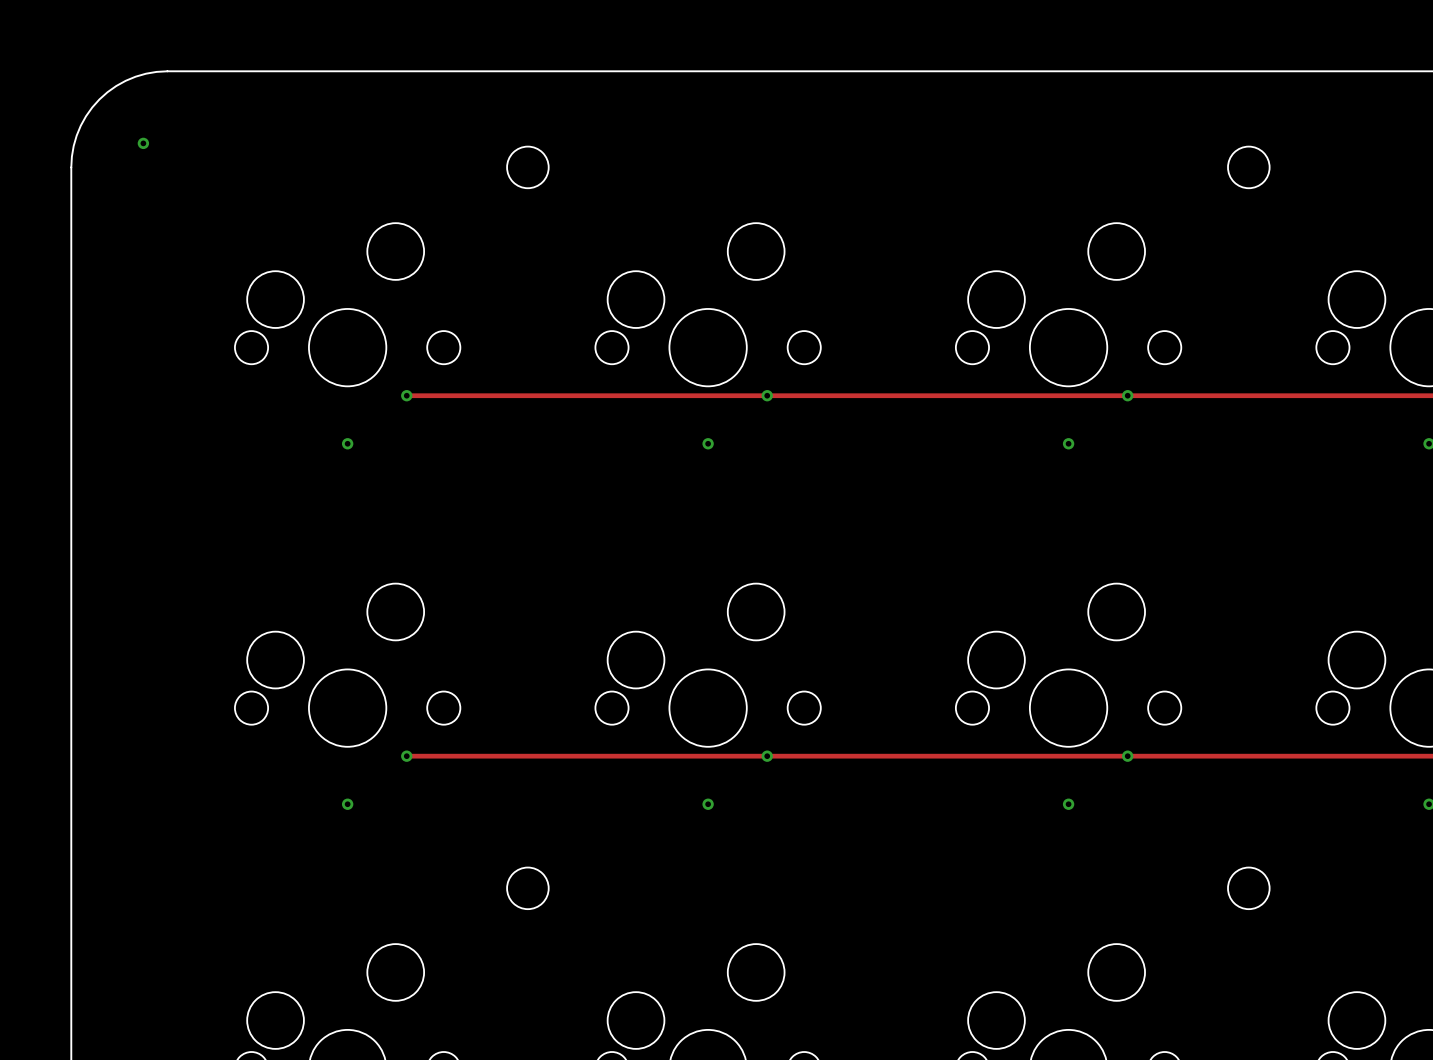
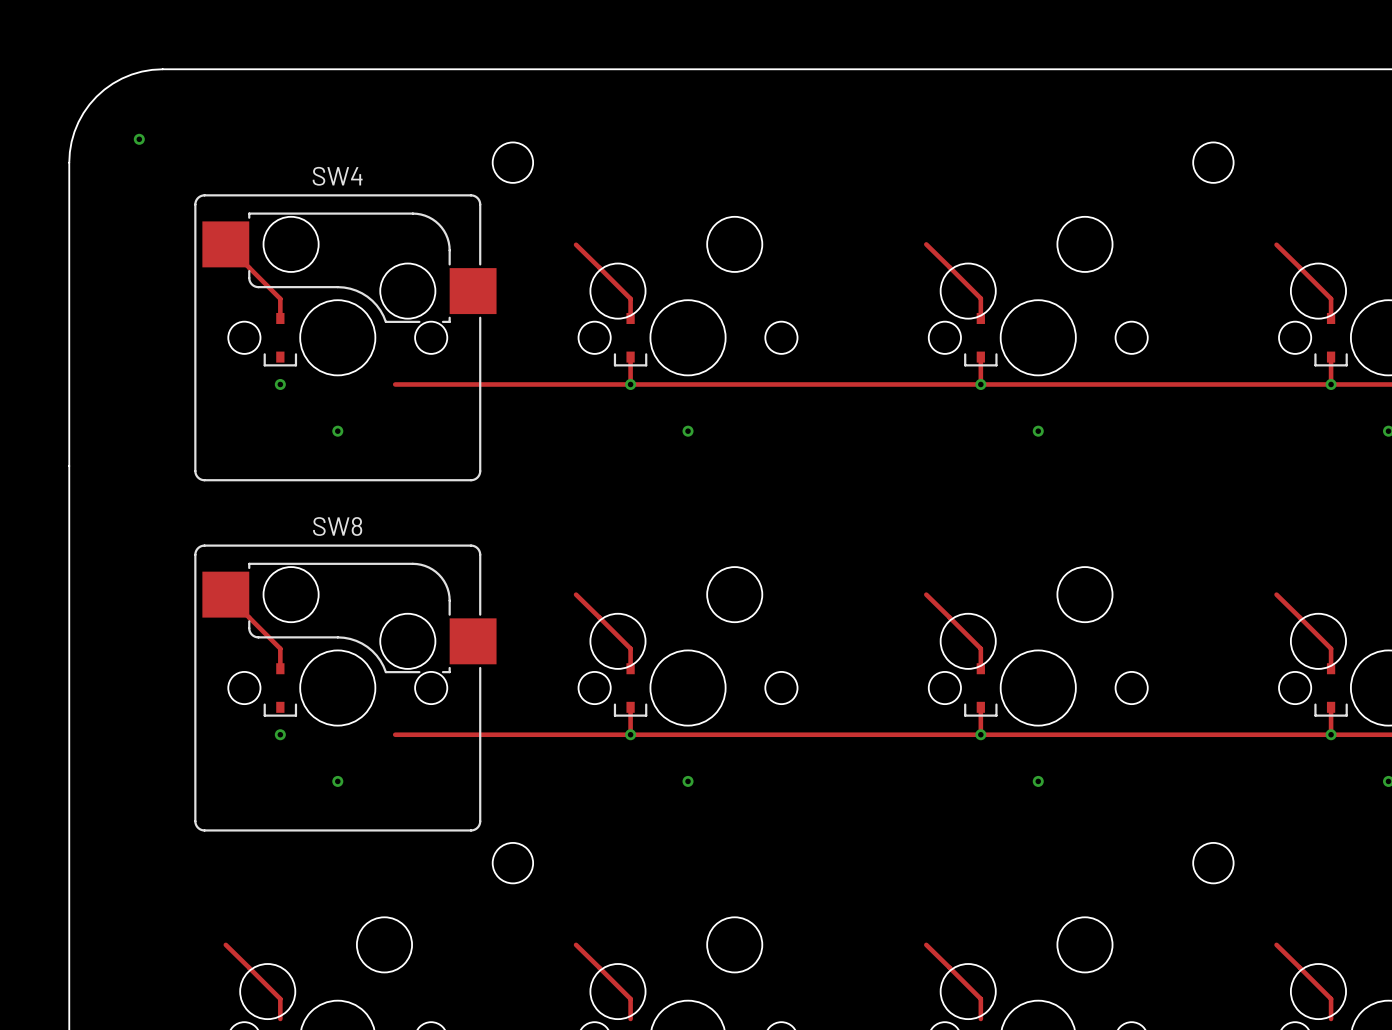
track: none -> (225, 244) (280, 298) (280, 318)
track: none -> (576, 244) (630, 298) (630, 318)
track: none -> (926, 244) (980, 298) (980, 318)
track: none -> (1276, 244) (1331, 298) (1331, 318)
part: (347, 304) -> none
SW4: none -> (345, 337)
part: none -> (280, 339)
part: none -> (630, 339)
part: none -> (980, 339)
part: none -> (1331, 339)
track: none -> (630, 357) (630, 384)
track: none -> (980, 357) (980, 384)
track: none -> (1331, 357) (1331, 384)
via: none -> (280, 384)
via: (406, 395) -> none
via: none -> (630, 384)
via: (767, 395) -> none
via: none -> (980, 384)
via: (1127, 395) -> none
via: none -> (1331, 384)
track: none -> (225, 594) (280, 648) (280, 668)
track: none -> (576, 594) (630, 648) (630, 668)
track: none -> (926, 594) (980, 648) (980, 668)
track: none -> (1276, 594) (1331, 648) (1331, 668)
part: (347, 665) -> none
SW8: none -> (345, 688)
part: none -> (280, 689)
part: none -> (630, 689)
part: none -> (980, 689)
part: none -> (1331, 689)
track: none -> (630, 707) (630, 734)
track: none -> (980, 707) (980, 734)
track: none -> (1331, 707) (1331, 734)
via: none -> (280, 734)
via: (406, 756) -> none
via: none -> (630, 734)
via: (767, 756) -> none
via: none -> (980, 734)
via: (1127, 756) -> none
via: none -> (1331, 734)
track: none -> (225, 944) (280, 998) (280, 1018)
track: none -> (576, 944) (630, 998) (630, 1018)
track: none -> (926, 944) (980, 998) (980, 1018)
track: none -> (1276, 944) (1331, 998) (1331, 1018)

